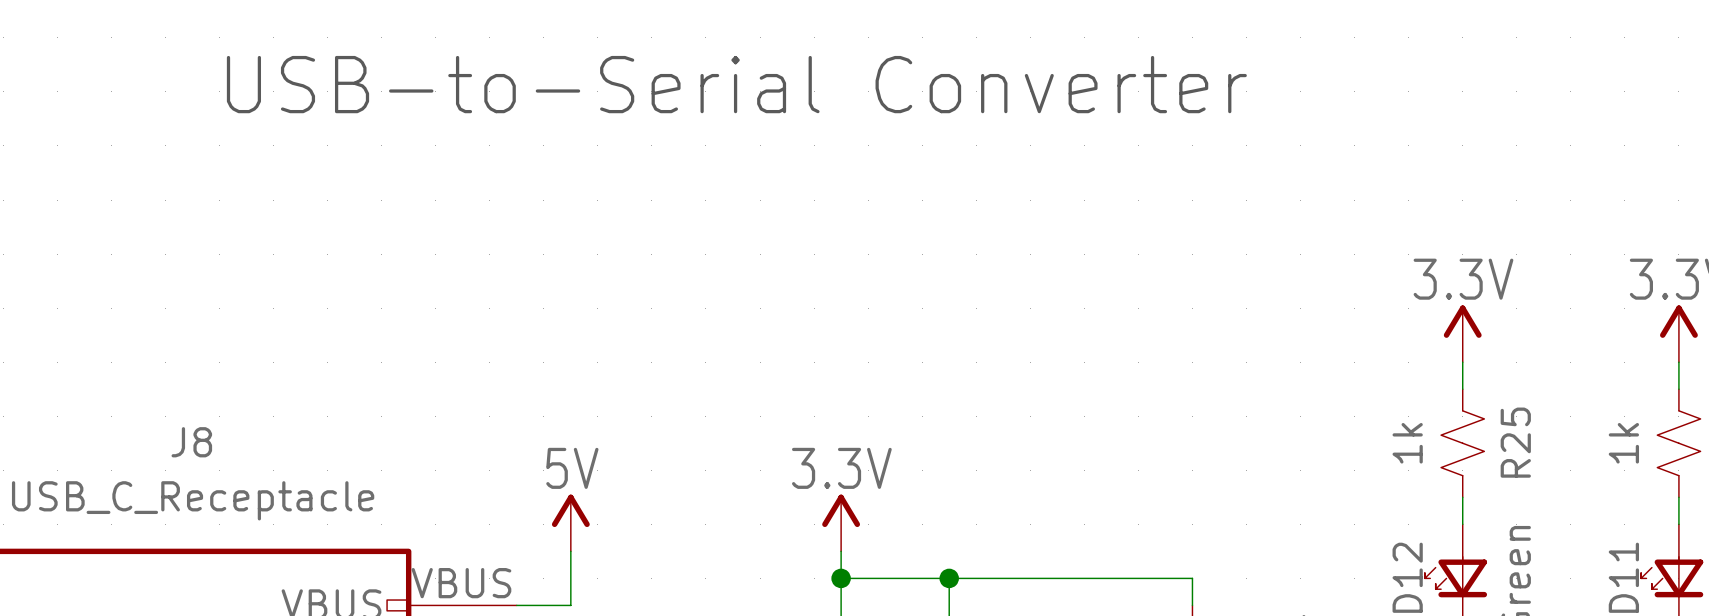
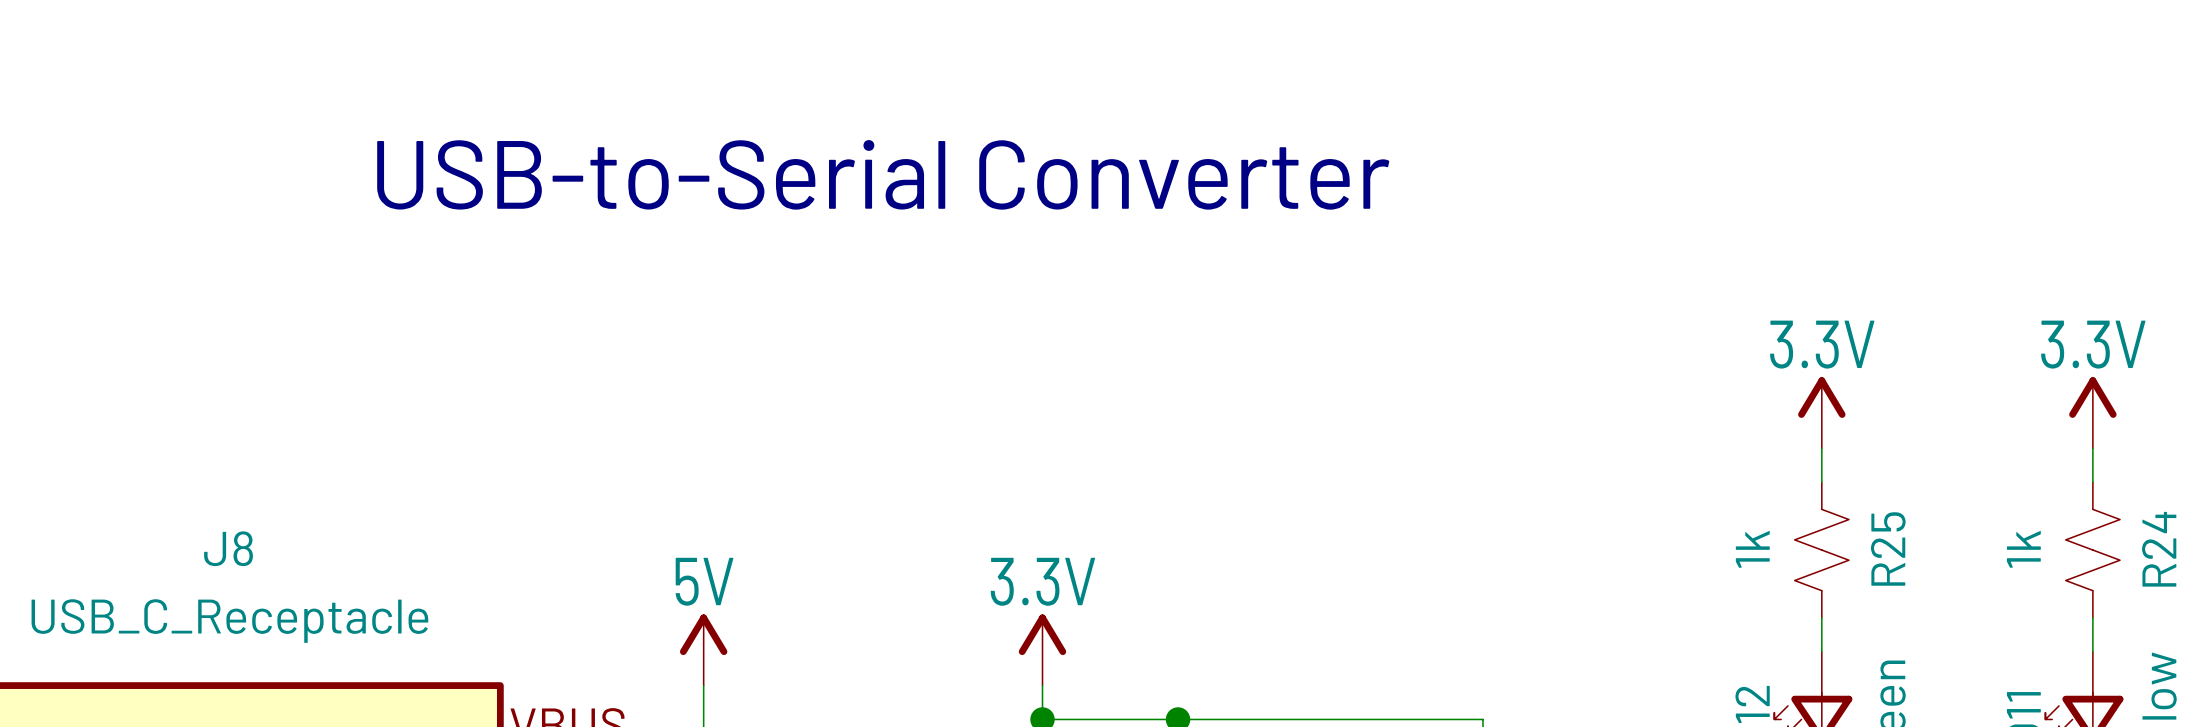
text position: USB-to-Serial Converter (736, 84) -> USB-to-Serial Converter (883, 174)

